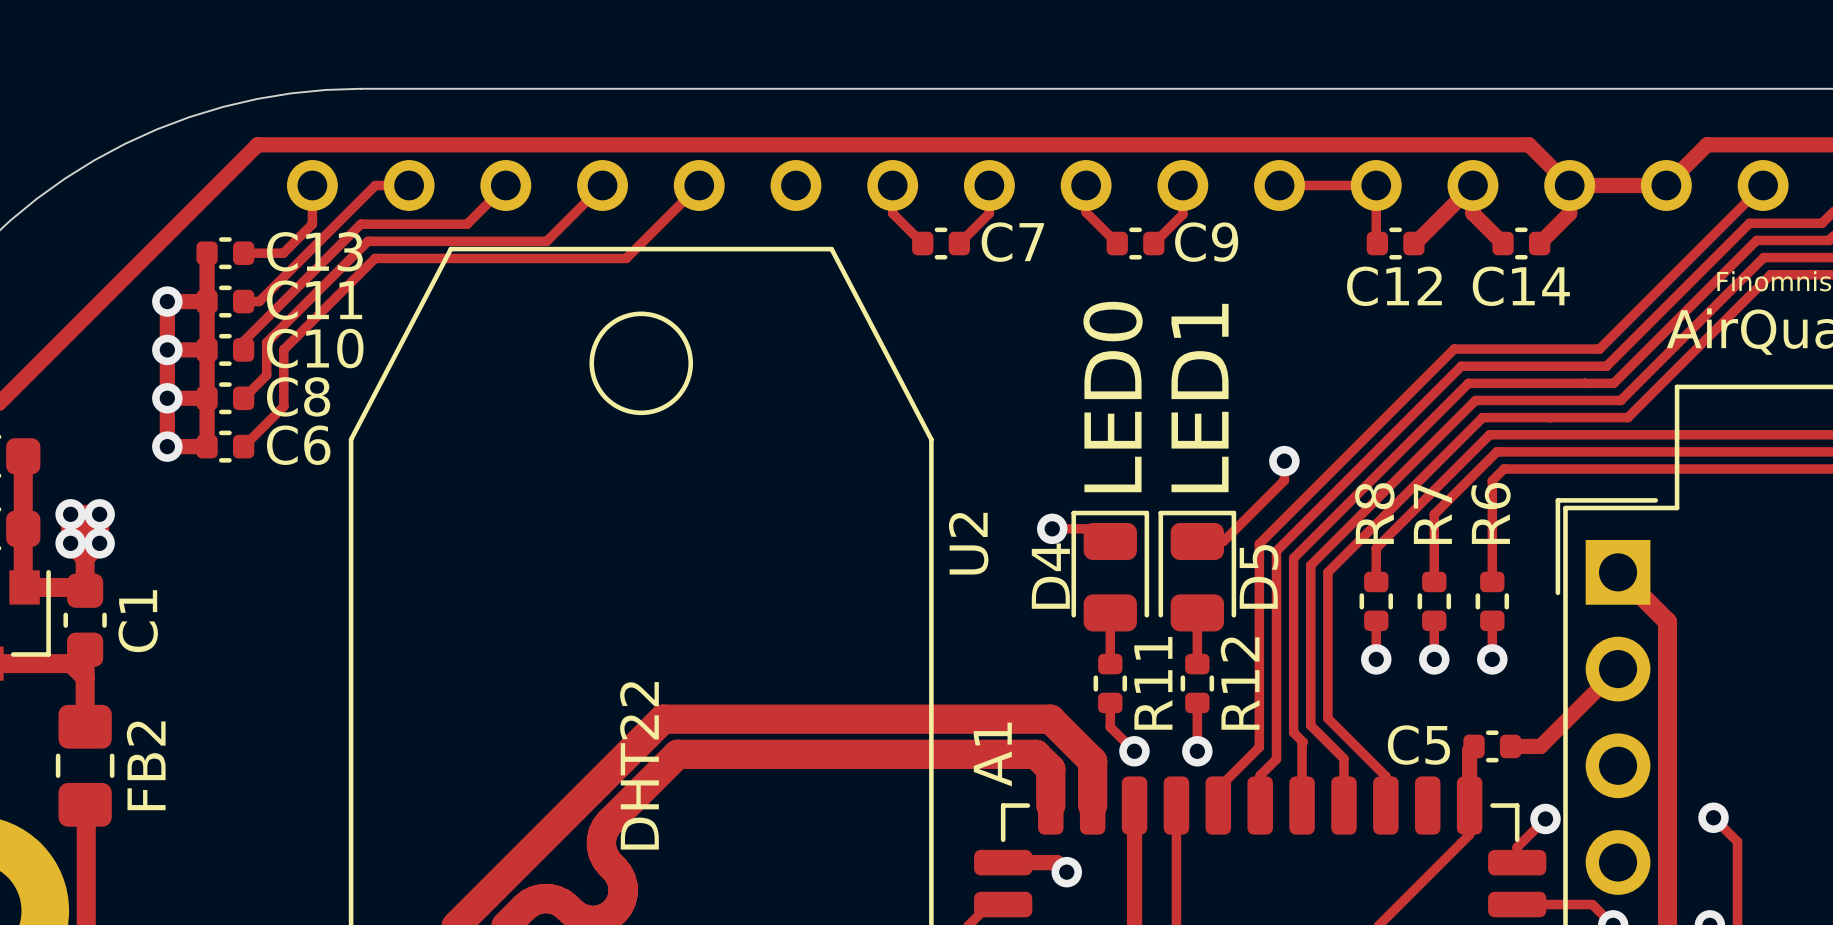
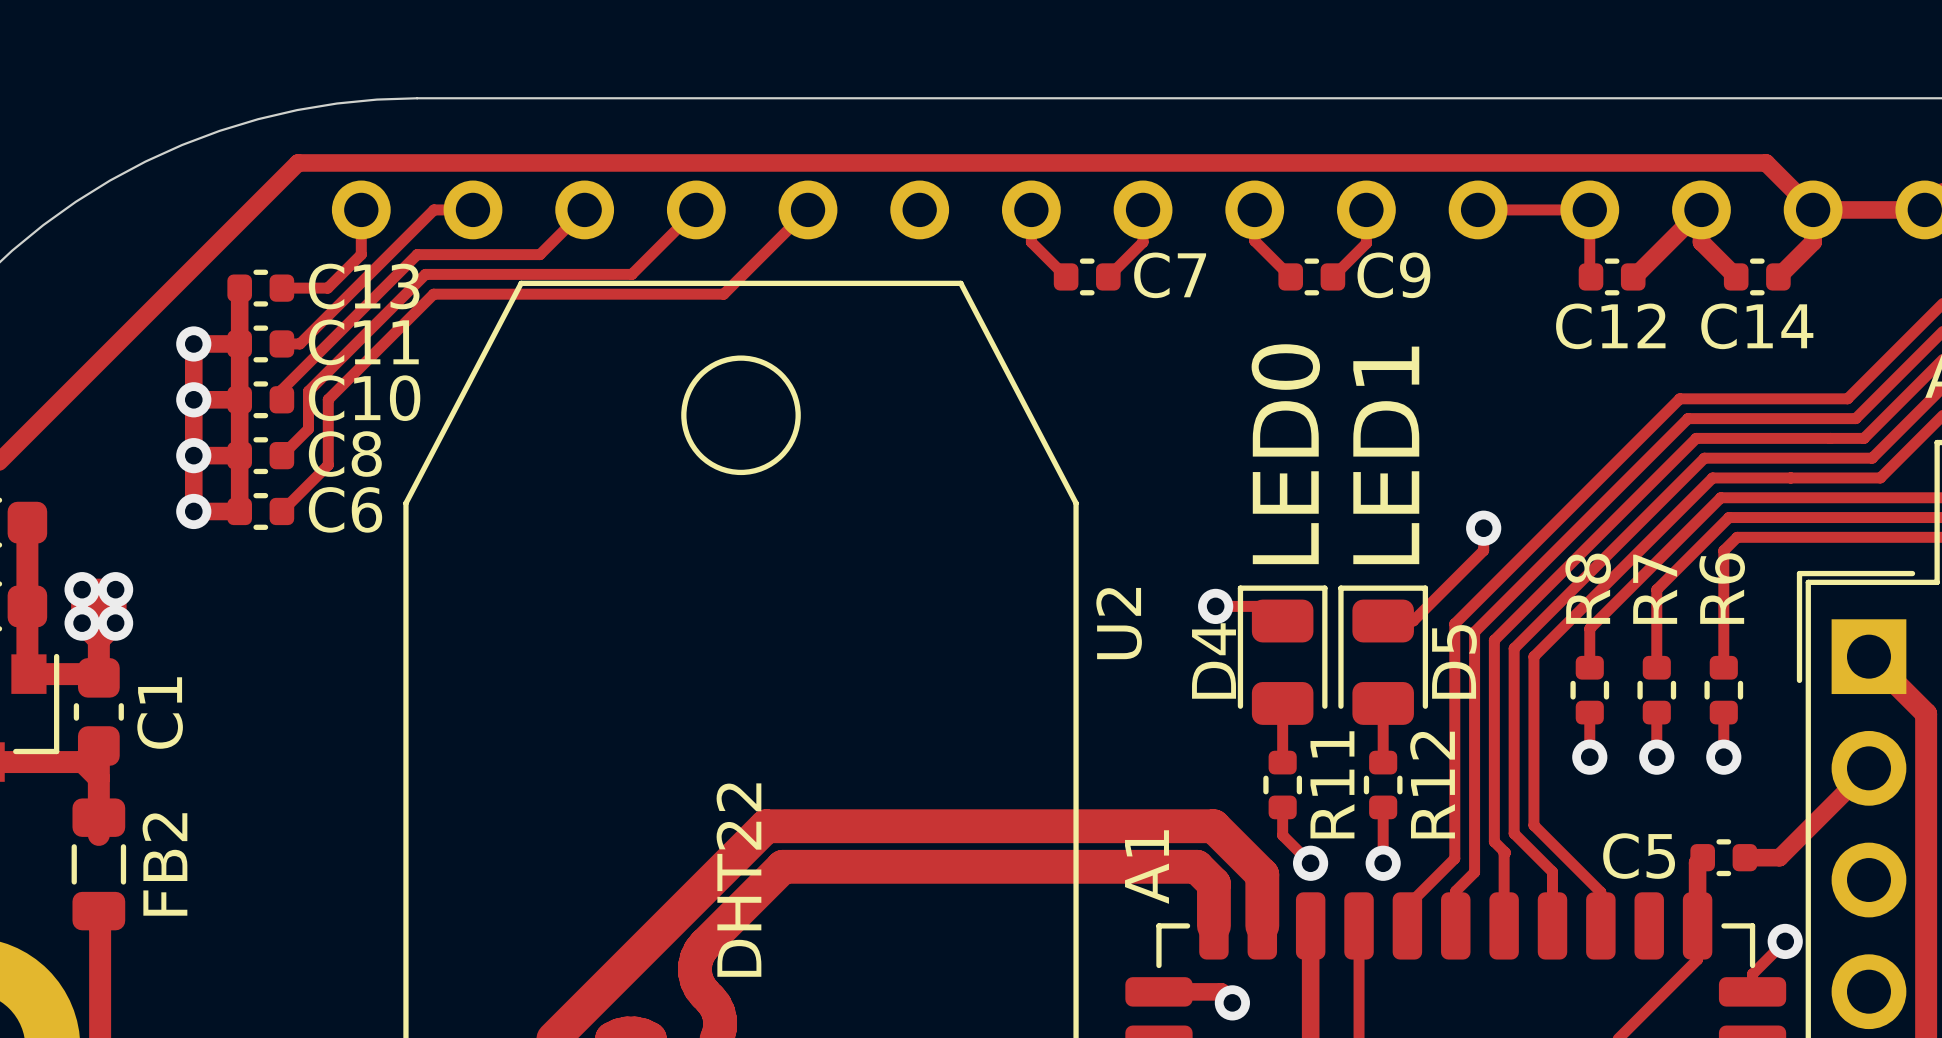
FB2 footprint: [55, 704, 115, 827] -> [71, 798, 127, 931]
FB2 name position: FB2 (146, 765) -> FB2 (164, 864)

